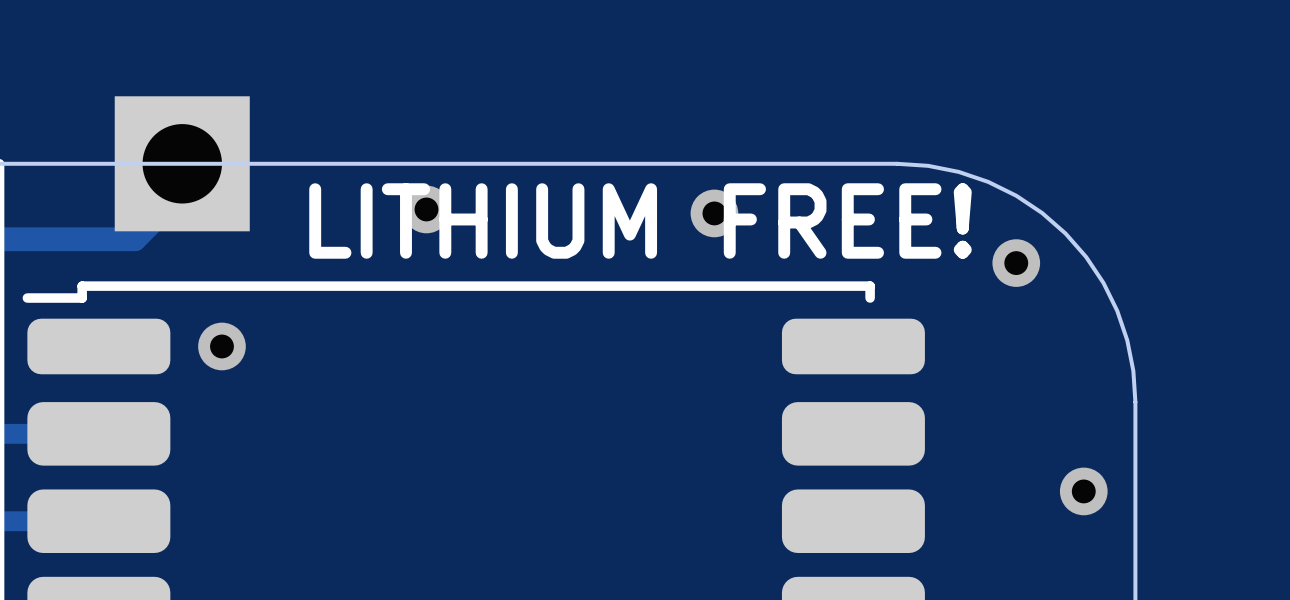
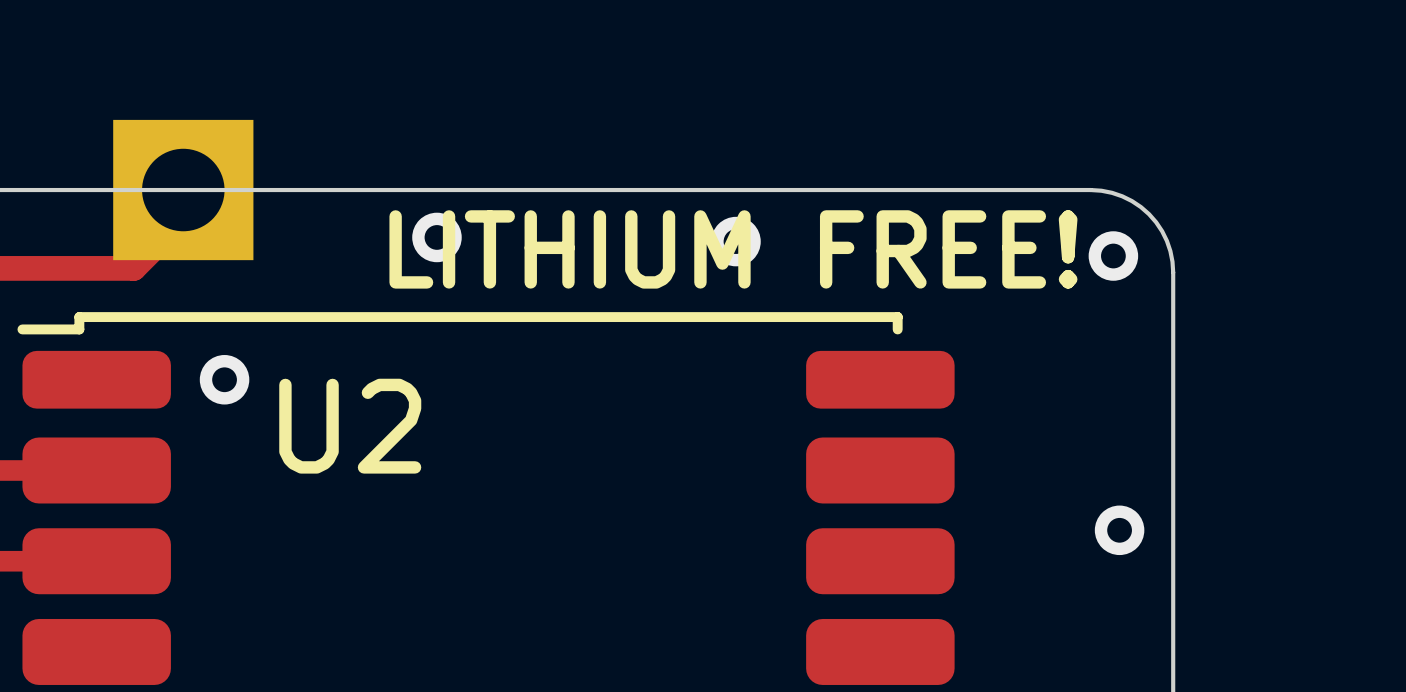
board edge: (897, 163) (928, 165) (958, 171) (988, 181) (1016, 195) (1042, 213) (1065, 233) (1086, 257) (1103, 282) (1117, 310) (1127, 340) (1133, 370) (1135, 402) -> (925, 190) (1101, 190) (1131, 201) (1149, 214) (1166, 240) (1172, 261) (1173, 437)
text position: LITHIUM FREE! (640, 220) -> LITHIUM FREE! (733, 249)
via position: (1016, 263) -> (1113, 256)
U2 name: none -> U2 (350, 426)

